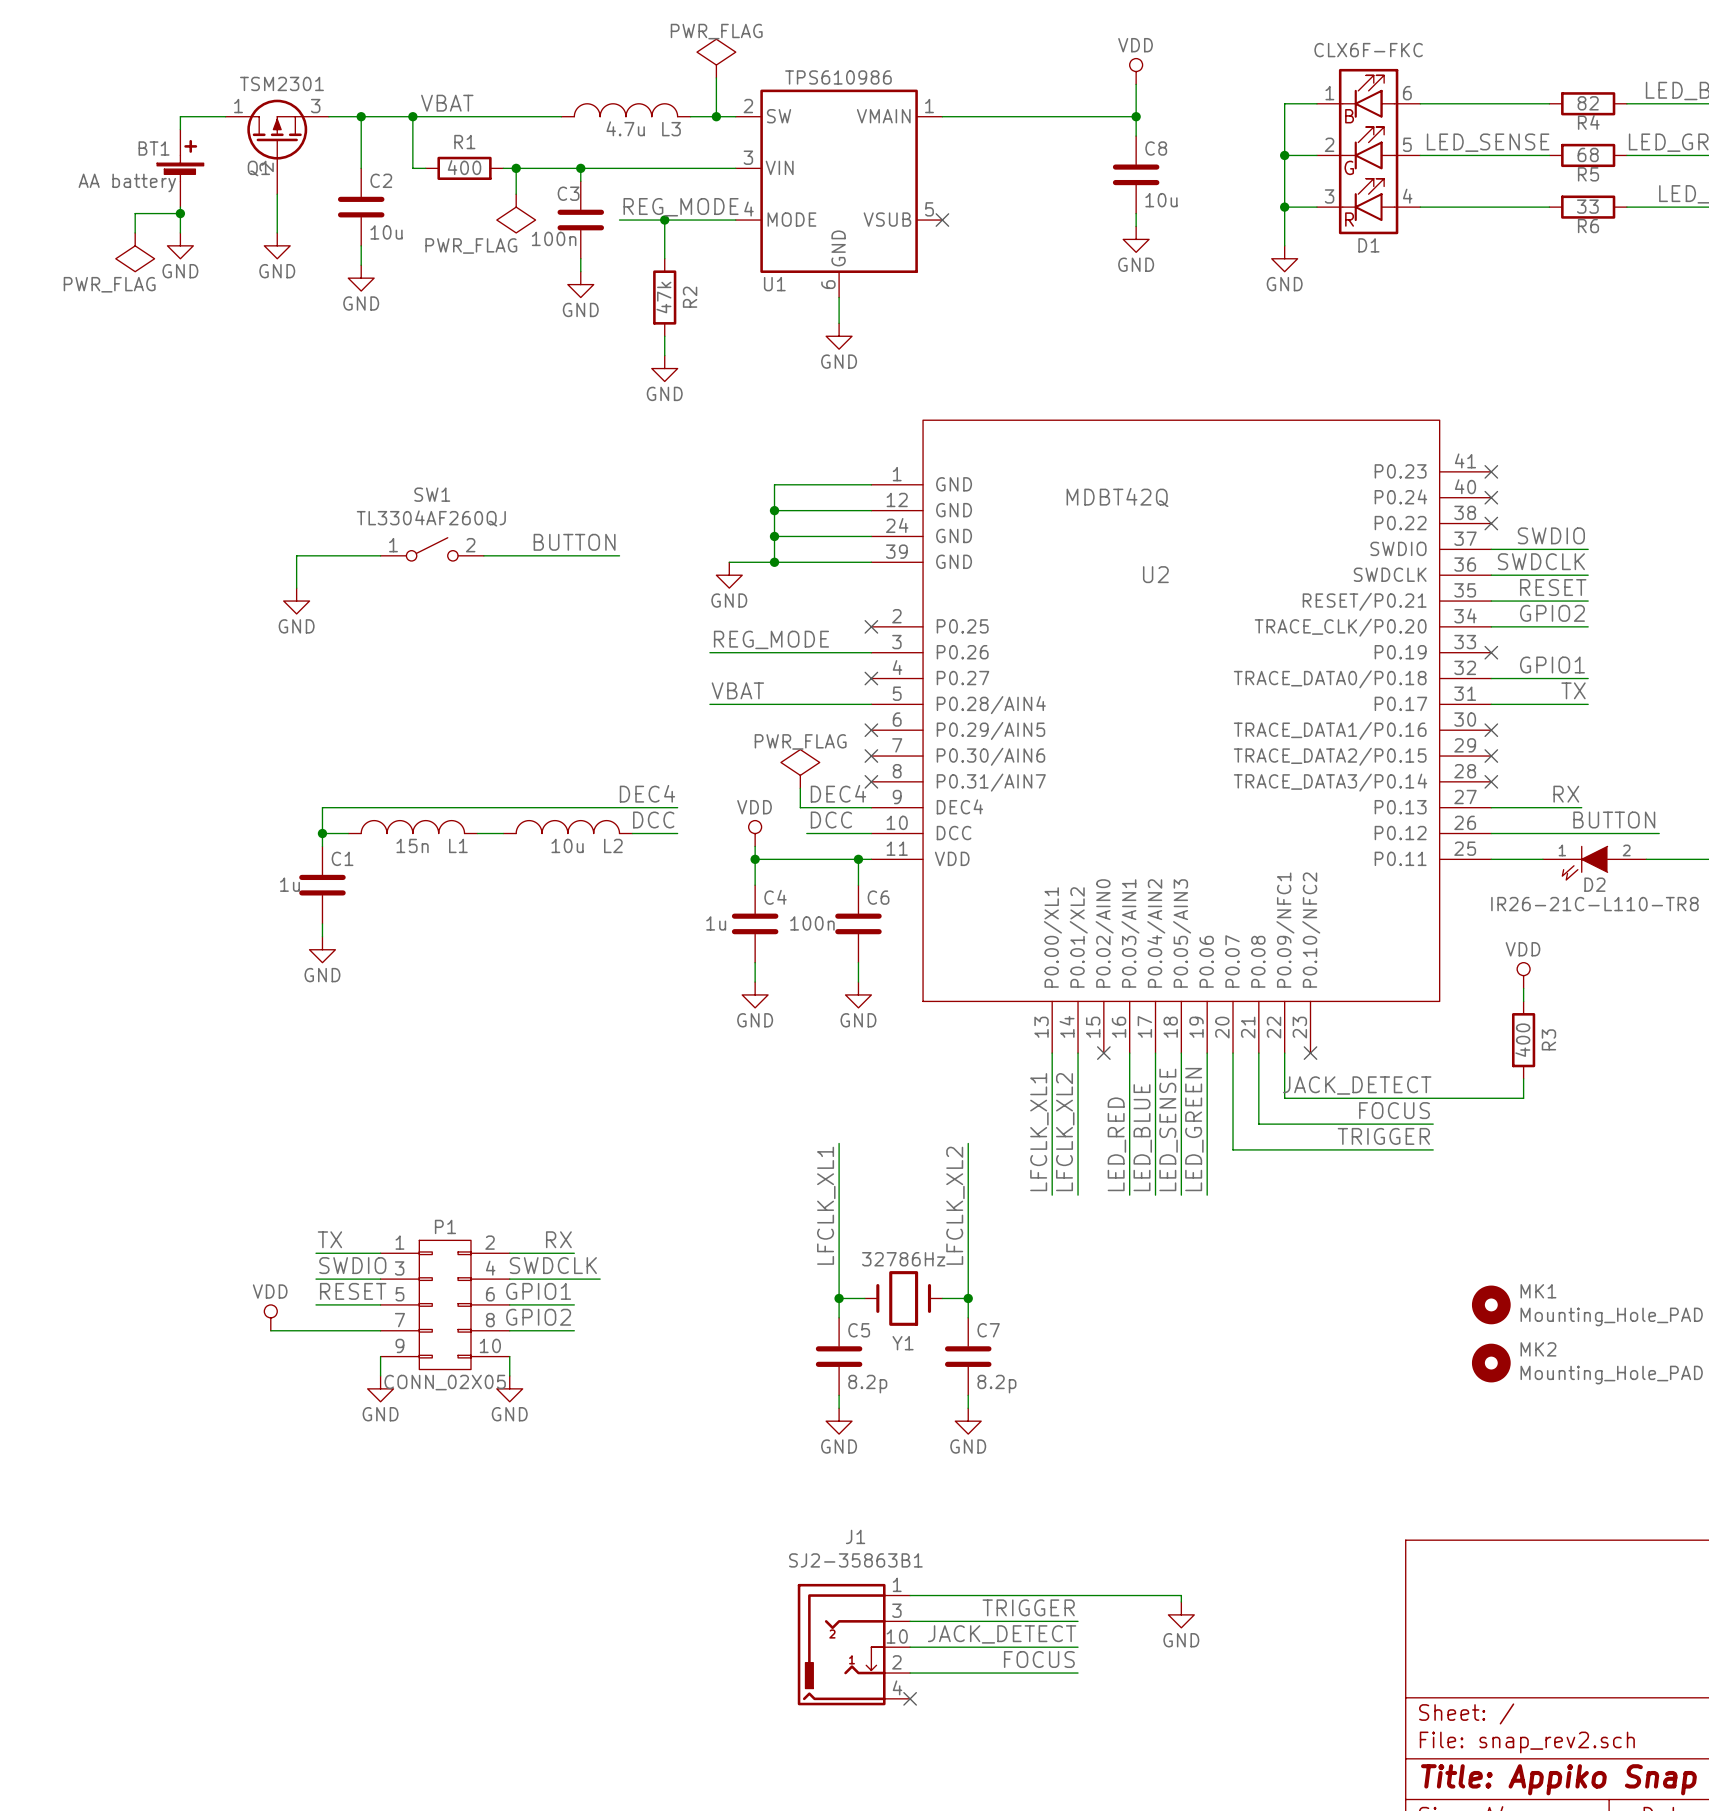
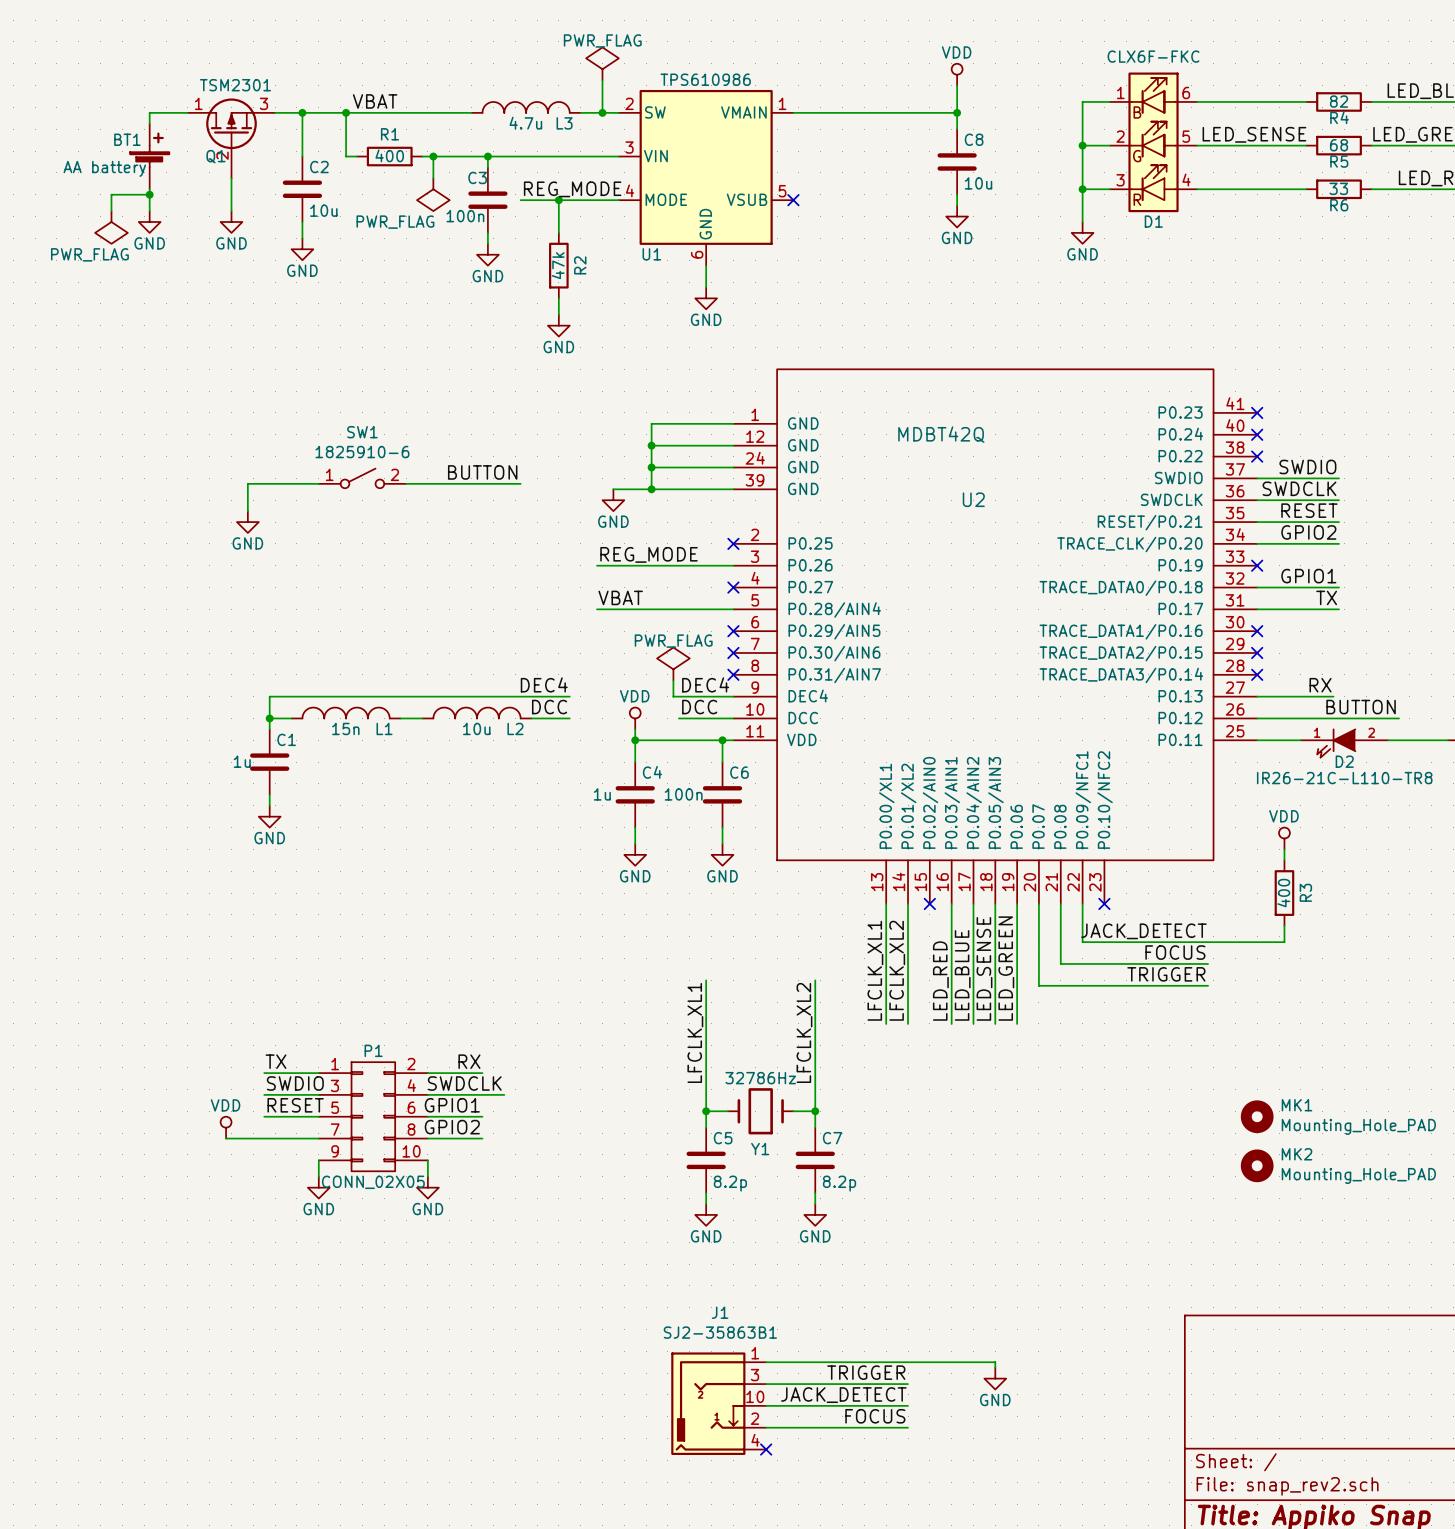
SW1 value: TL3304AF260QJ (431, 518) -> 1825910-6 (362, 452)

